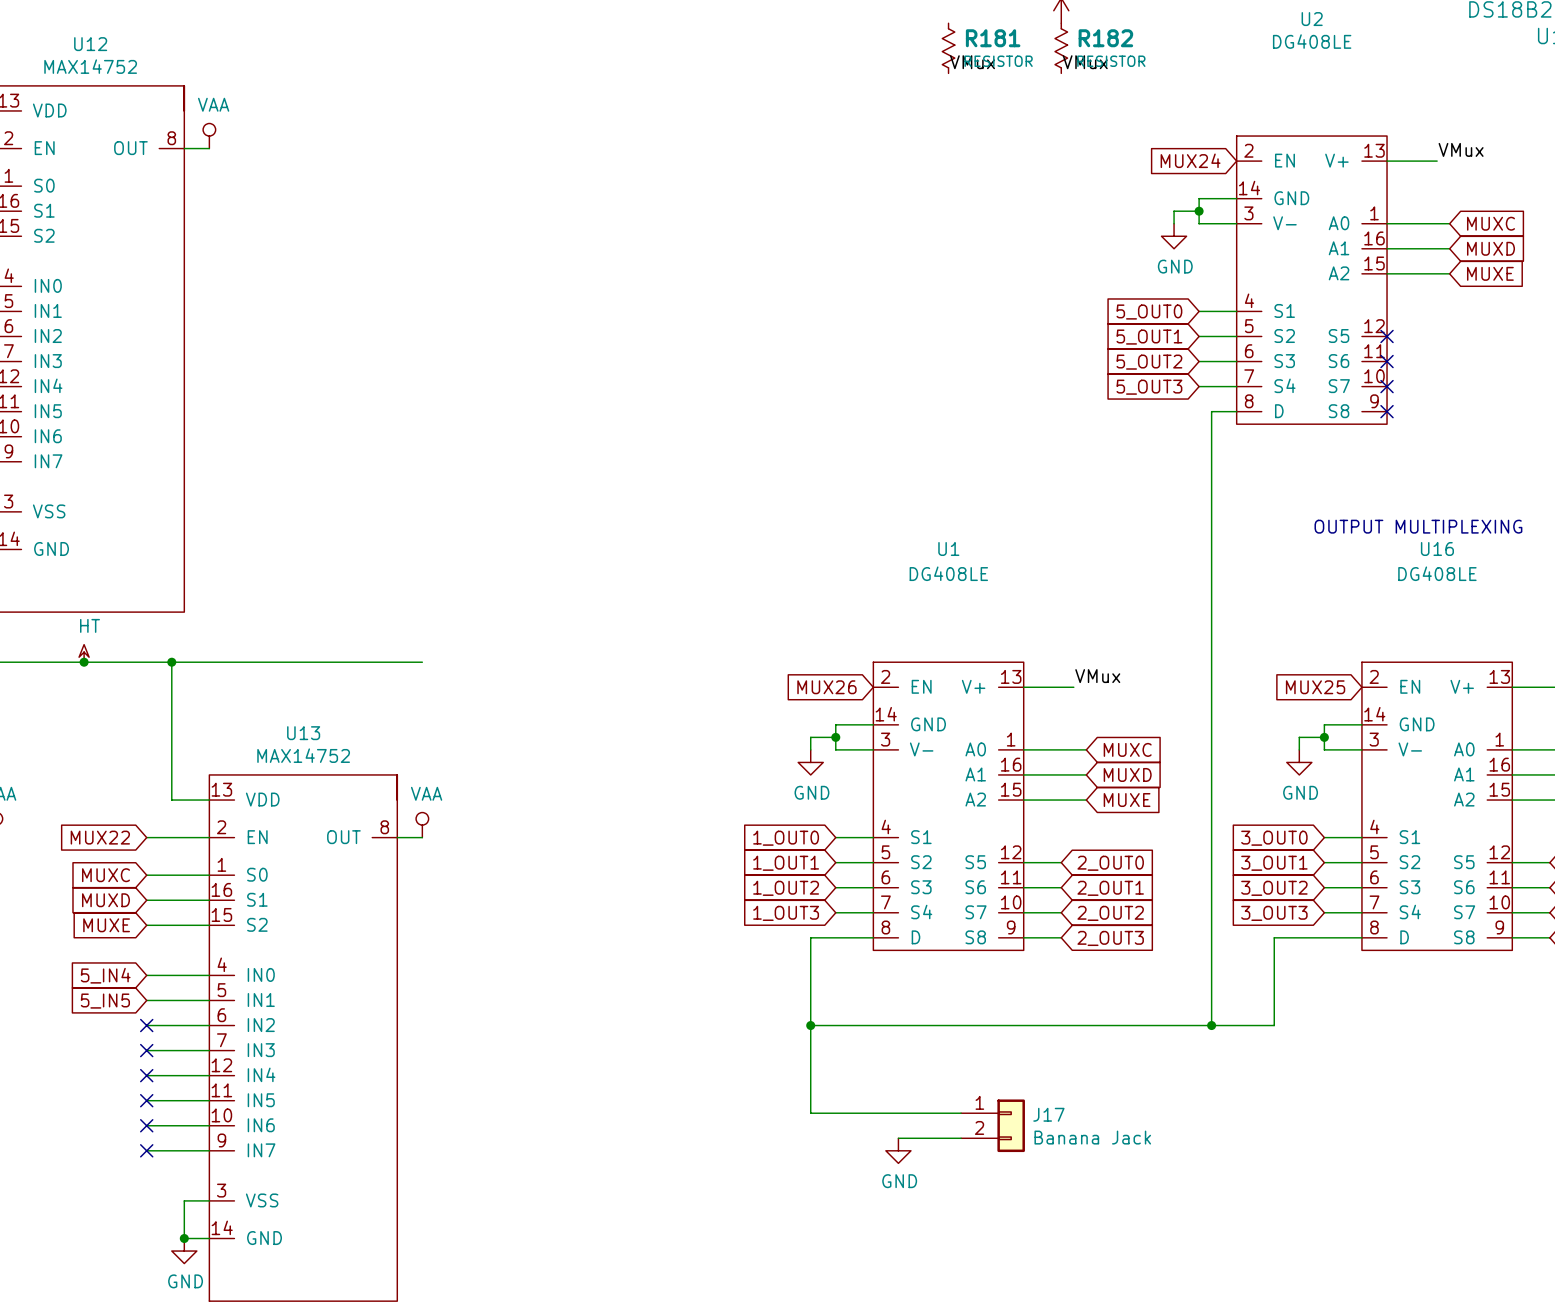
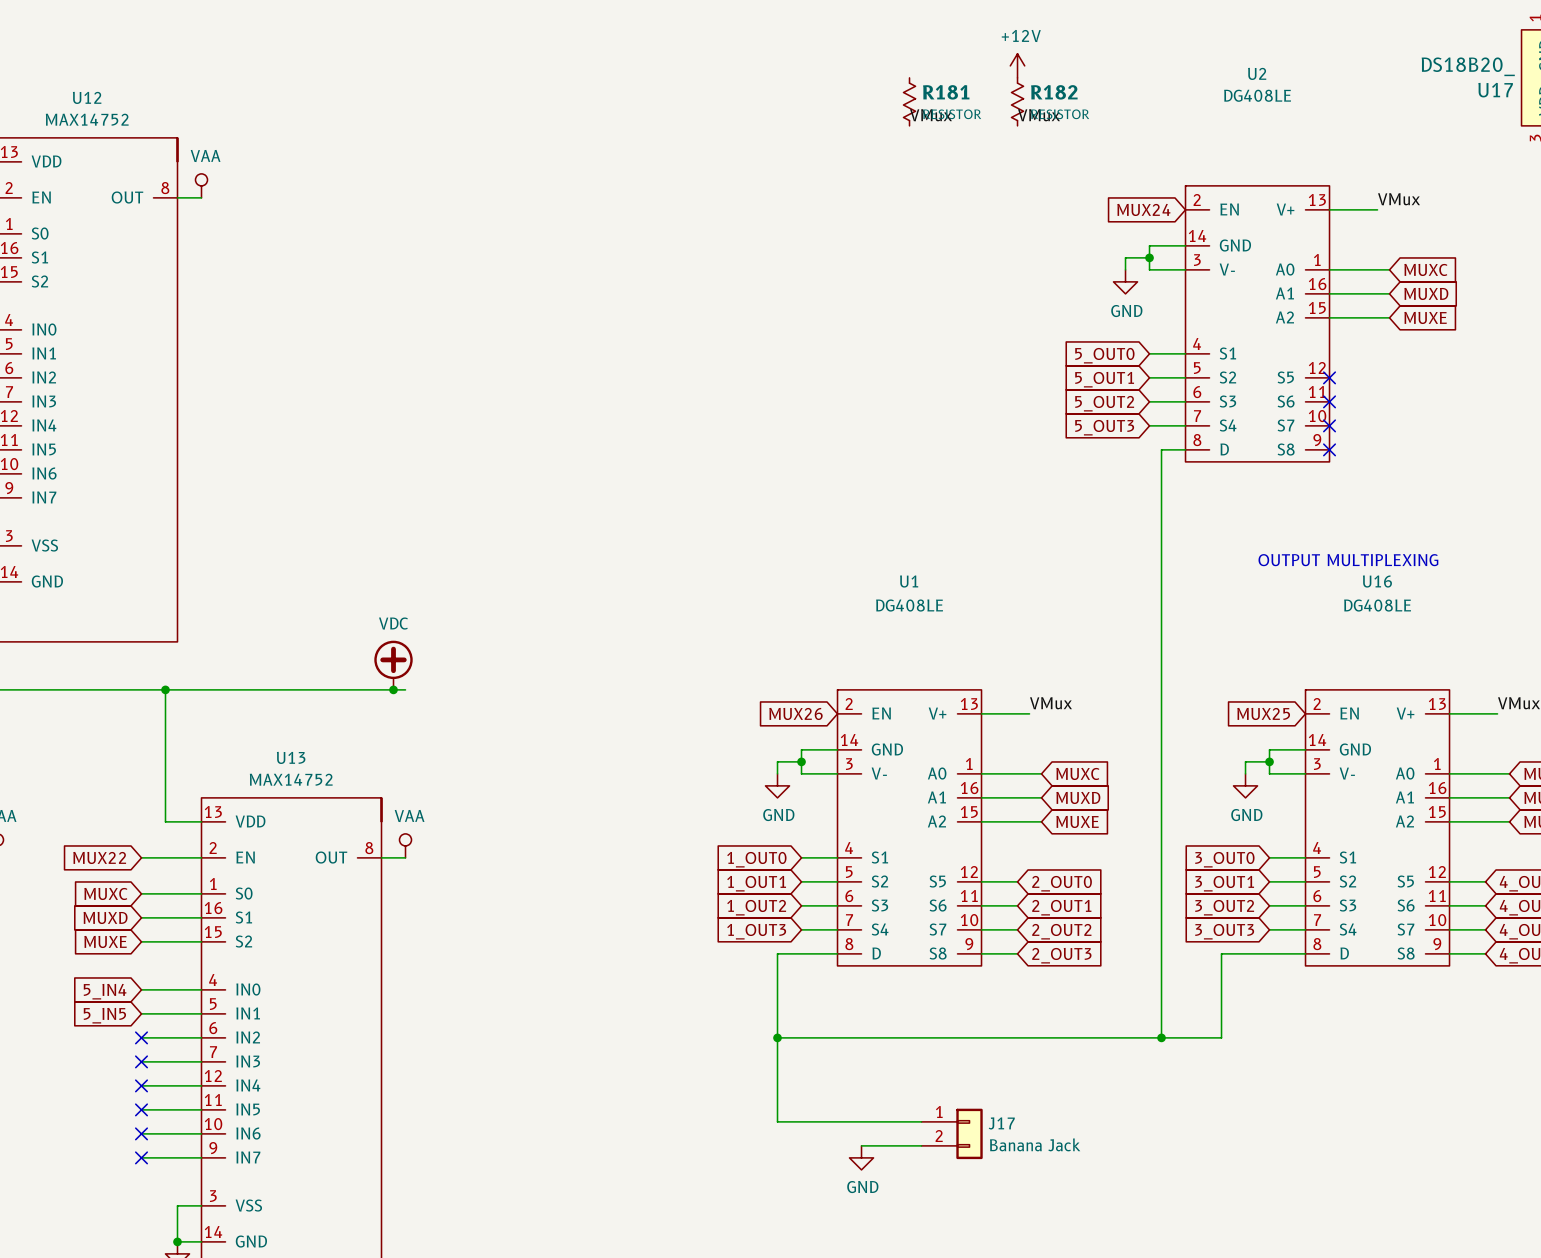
power symbol: none -> VDC (393, 665)
power symbol: HT (84, 653) -> none
junction: (84, 662) -> none
junction: none -> (393, 689)

